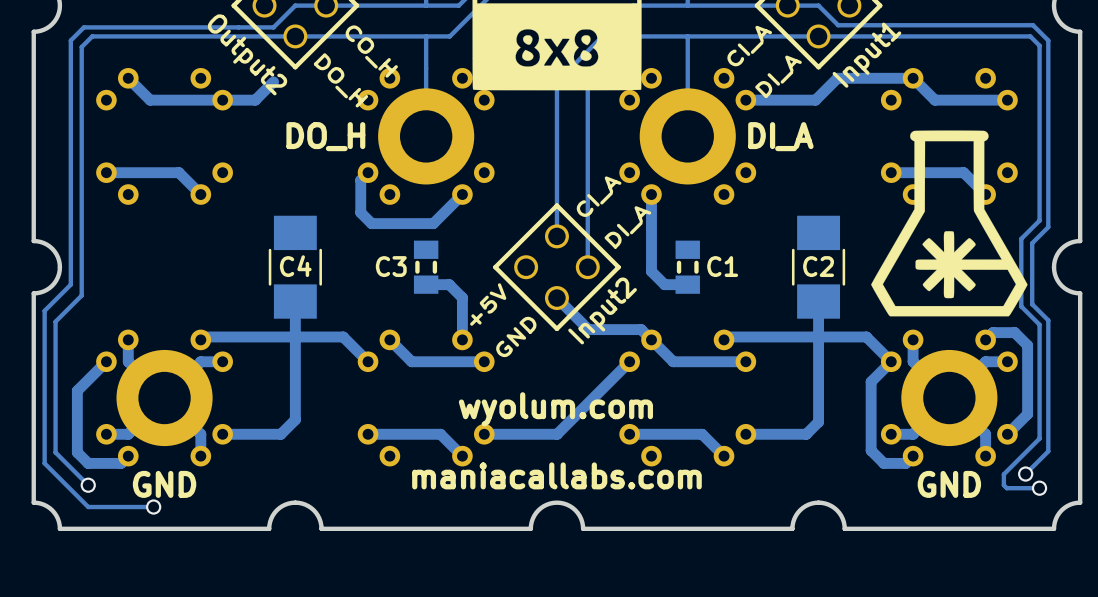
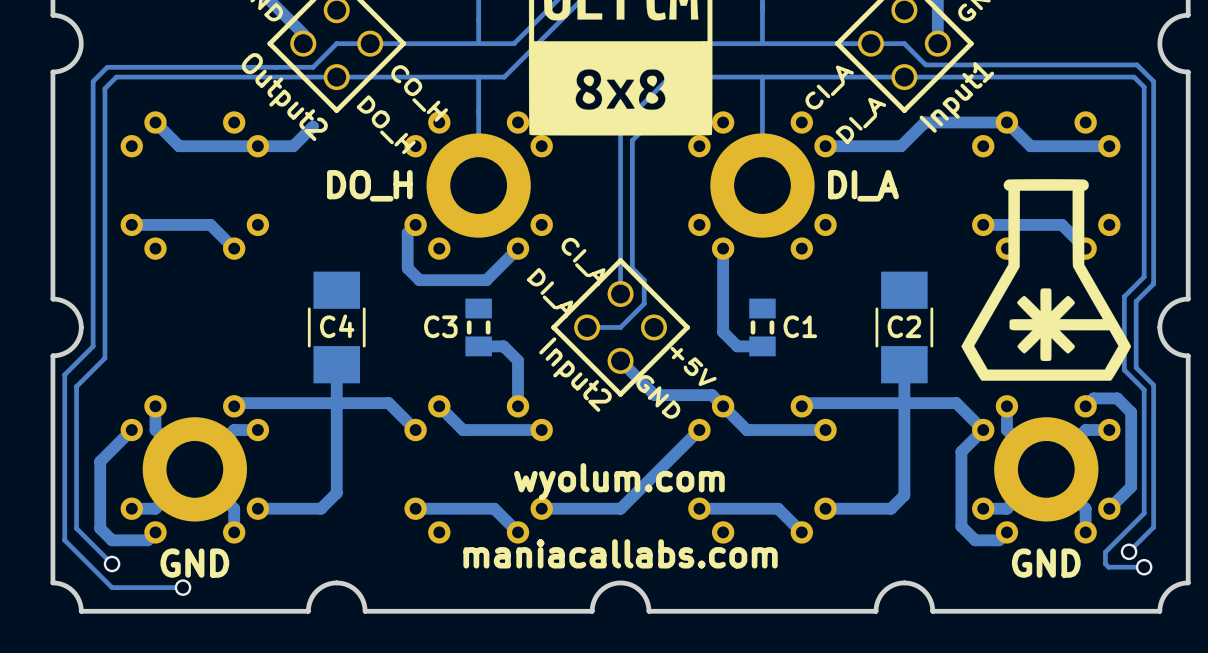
track: (587, 74) (587, 267) -> (654, 118) (632, 140) (632, 268) (644, 280) (644, 303) (620, 327) (587, 327)
text rotation: 0° (599, 196) -> 90° clockwise (583, 261)
text position: CI_A (599, 196) -> CI_A (583, 261)
text rotation: 0° (627, 227) -> 90° clockwise (550, 293)
text position: DI_A (627, 227) -> DI_A (550, 293)
text rotation: 0° (488, 304) -> 90° clockwise (693, 366)
text position: +5V (488, 304) -> +5V (693, 366)
part value rotation: 0° (602, 310) -> 90° clockwise (575, 374)
text rotation: 0° (516, 336) -> 90° clockwise (658, 396)
text position: GND (516, 336) -> GND (658, 396)

